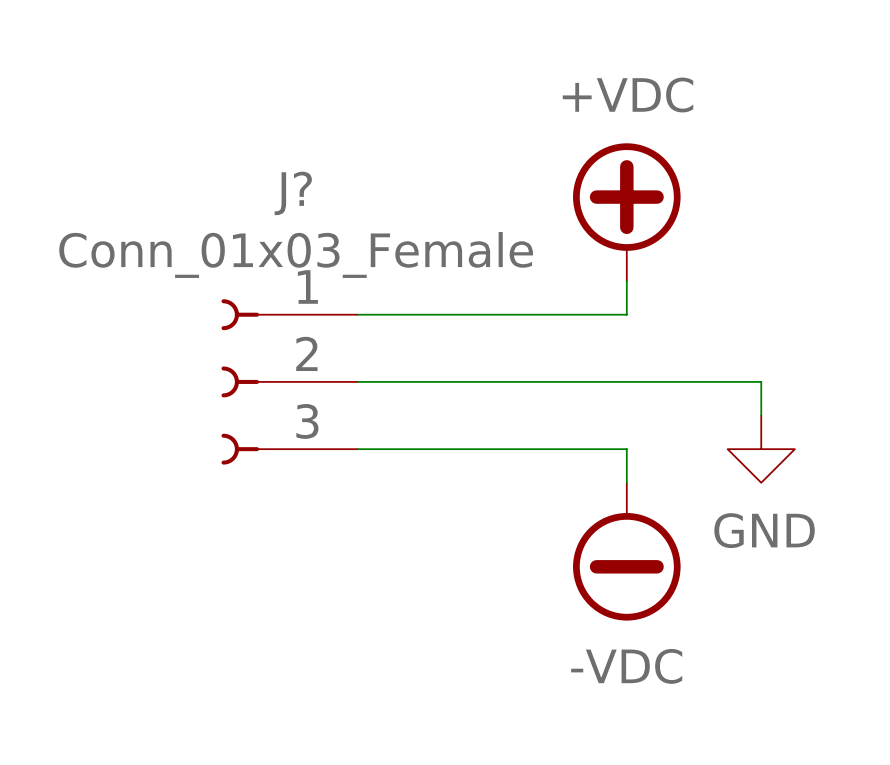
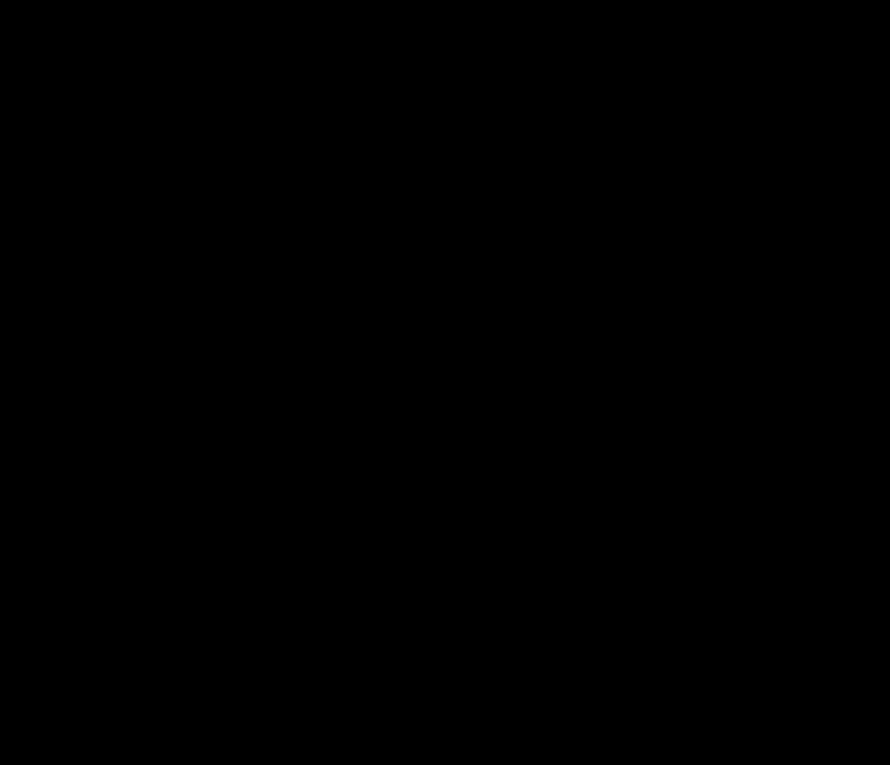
power symbol: +VDC (626, 212) -> none
wire: (626, 281) (626, 314) (357, 314) -> none
J?: Conn_01x03_Female (289, 381) -> none
wire: (357, 381) (761, 381) (761, 415) -> none
wire: (357, 449) (626, 449) (626, 482) -> none
power symbol: GND (761, 449) -> none
power symbol: -VDC (626, 551) -> none

